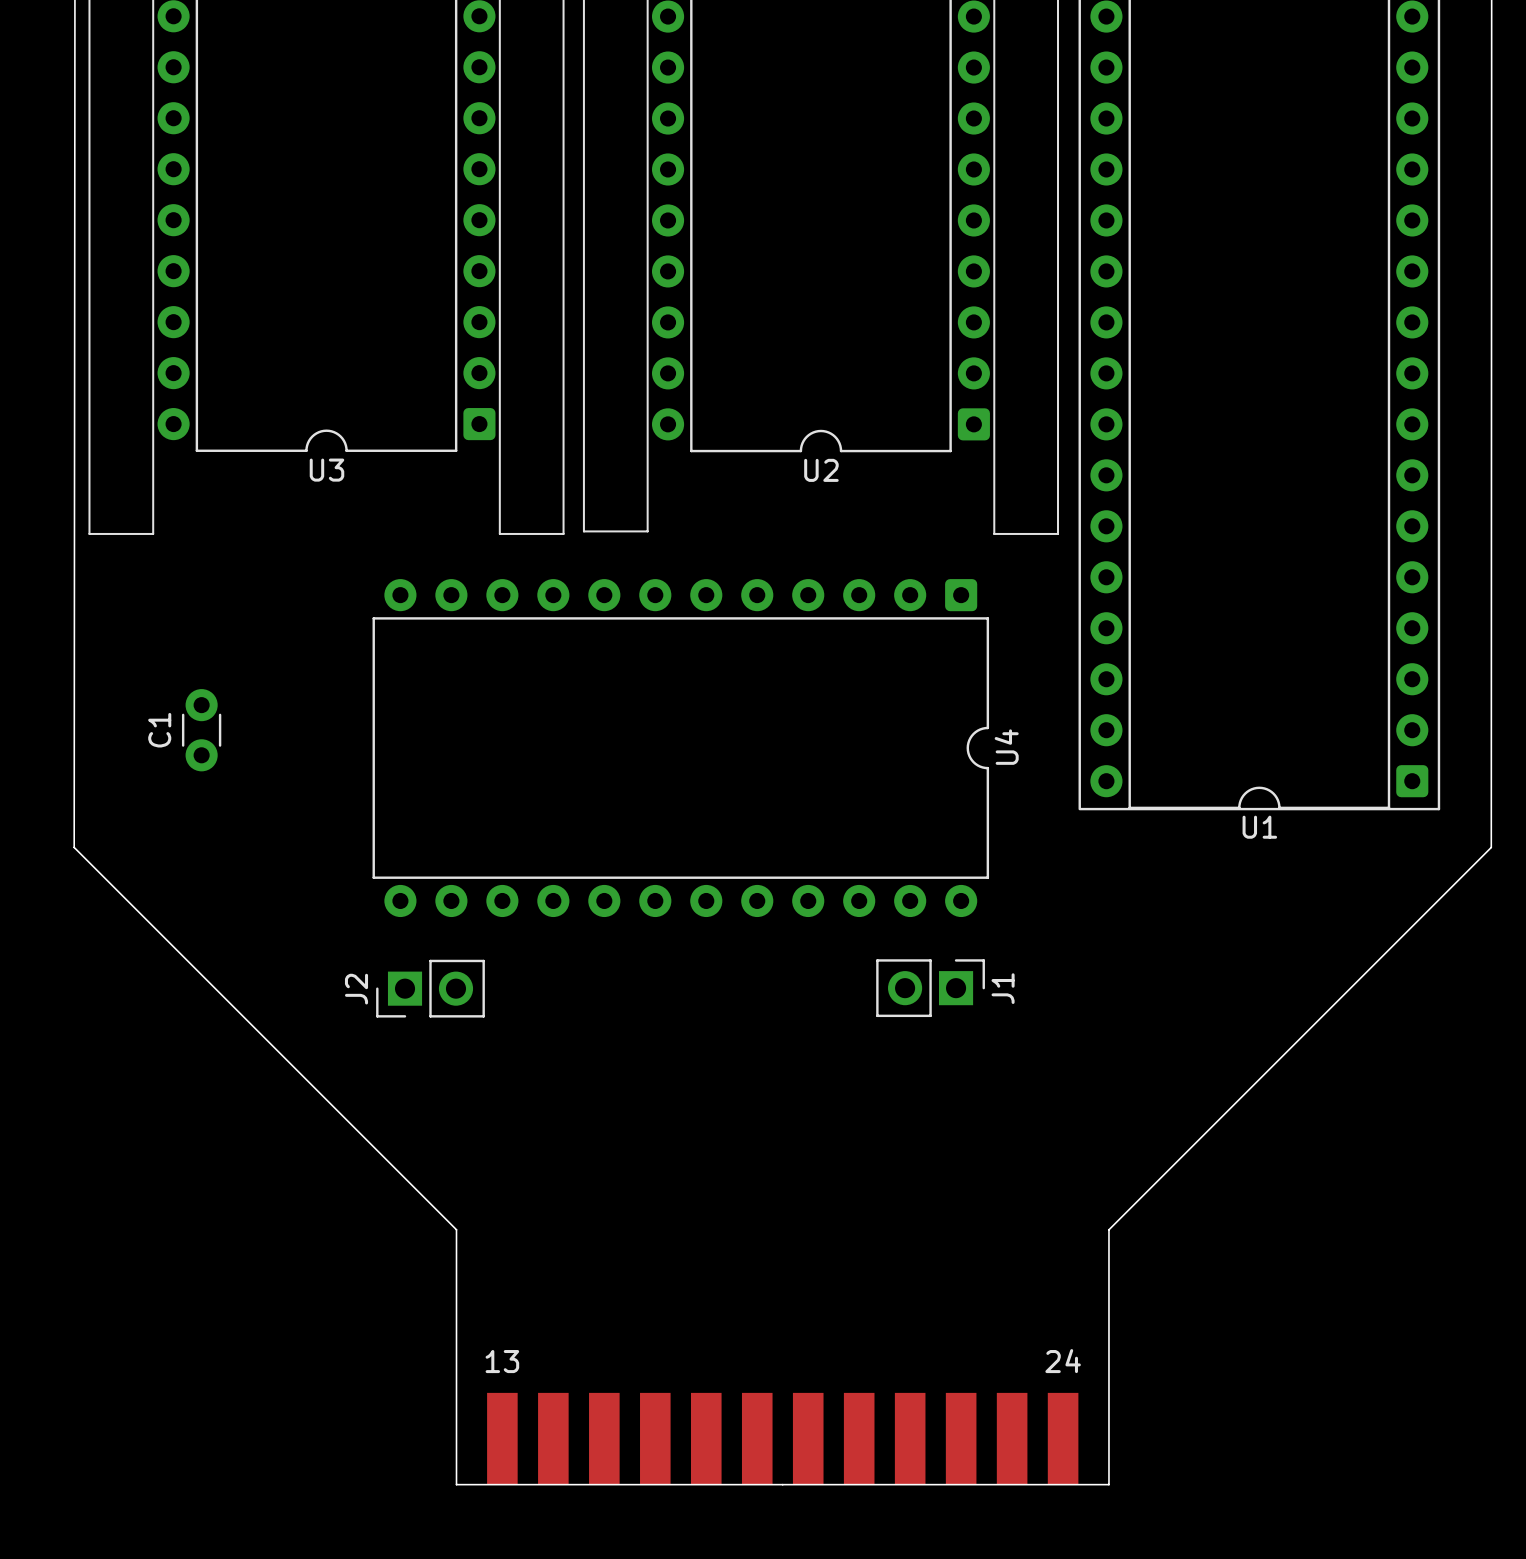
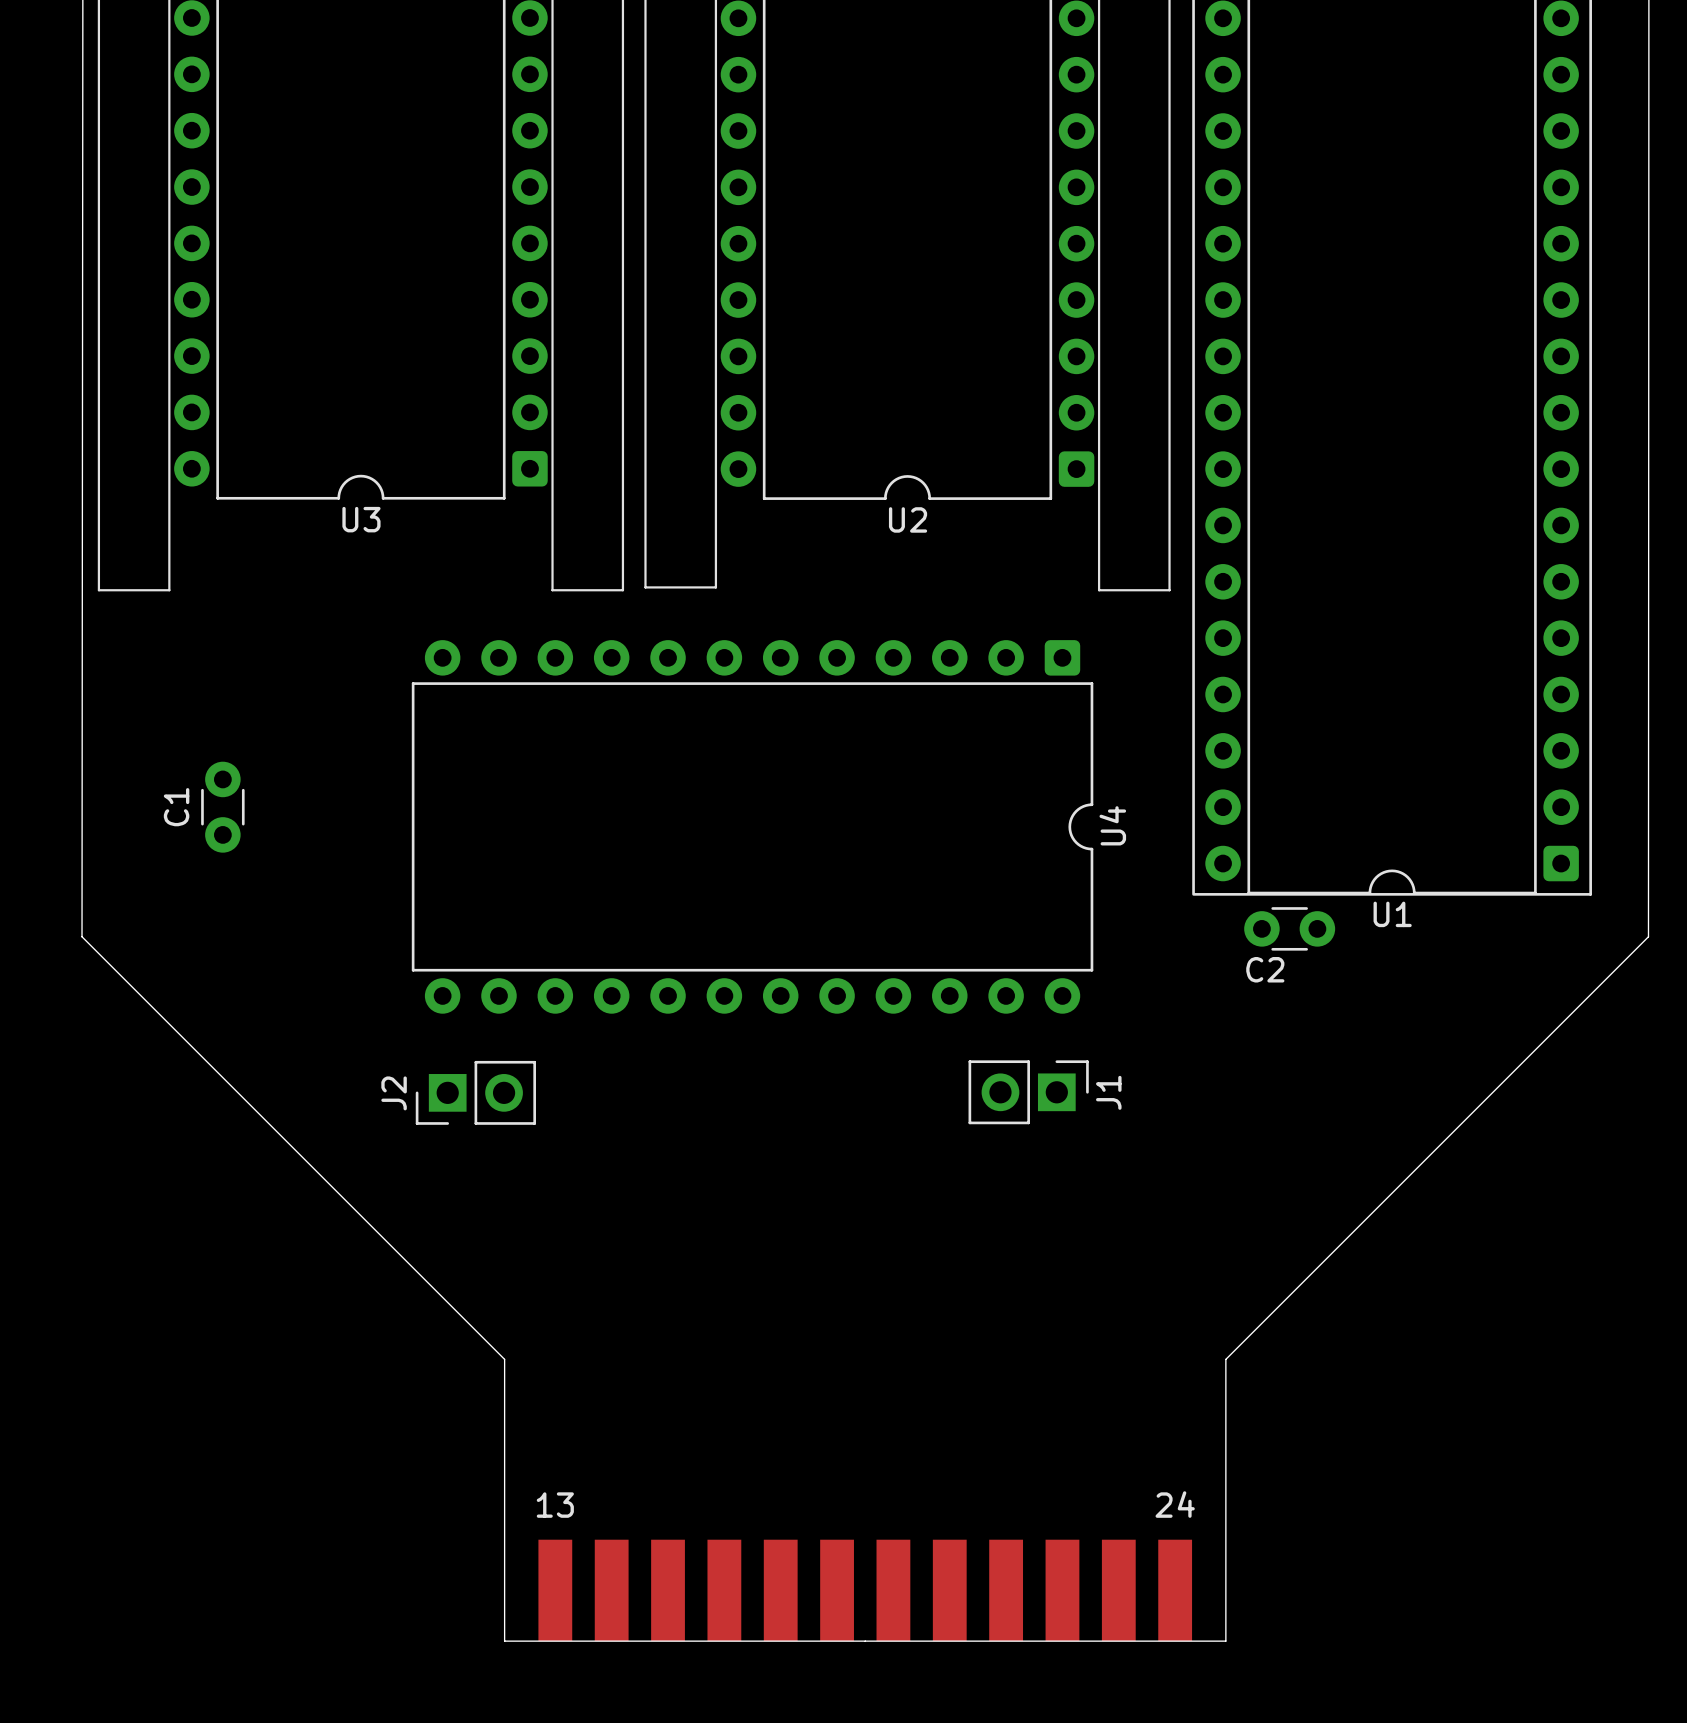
C2: none -> (1289, 928)

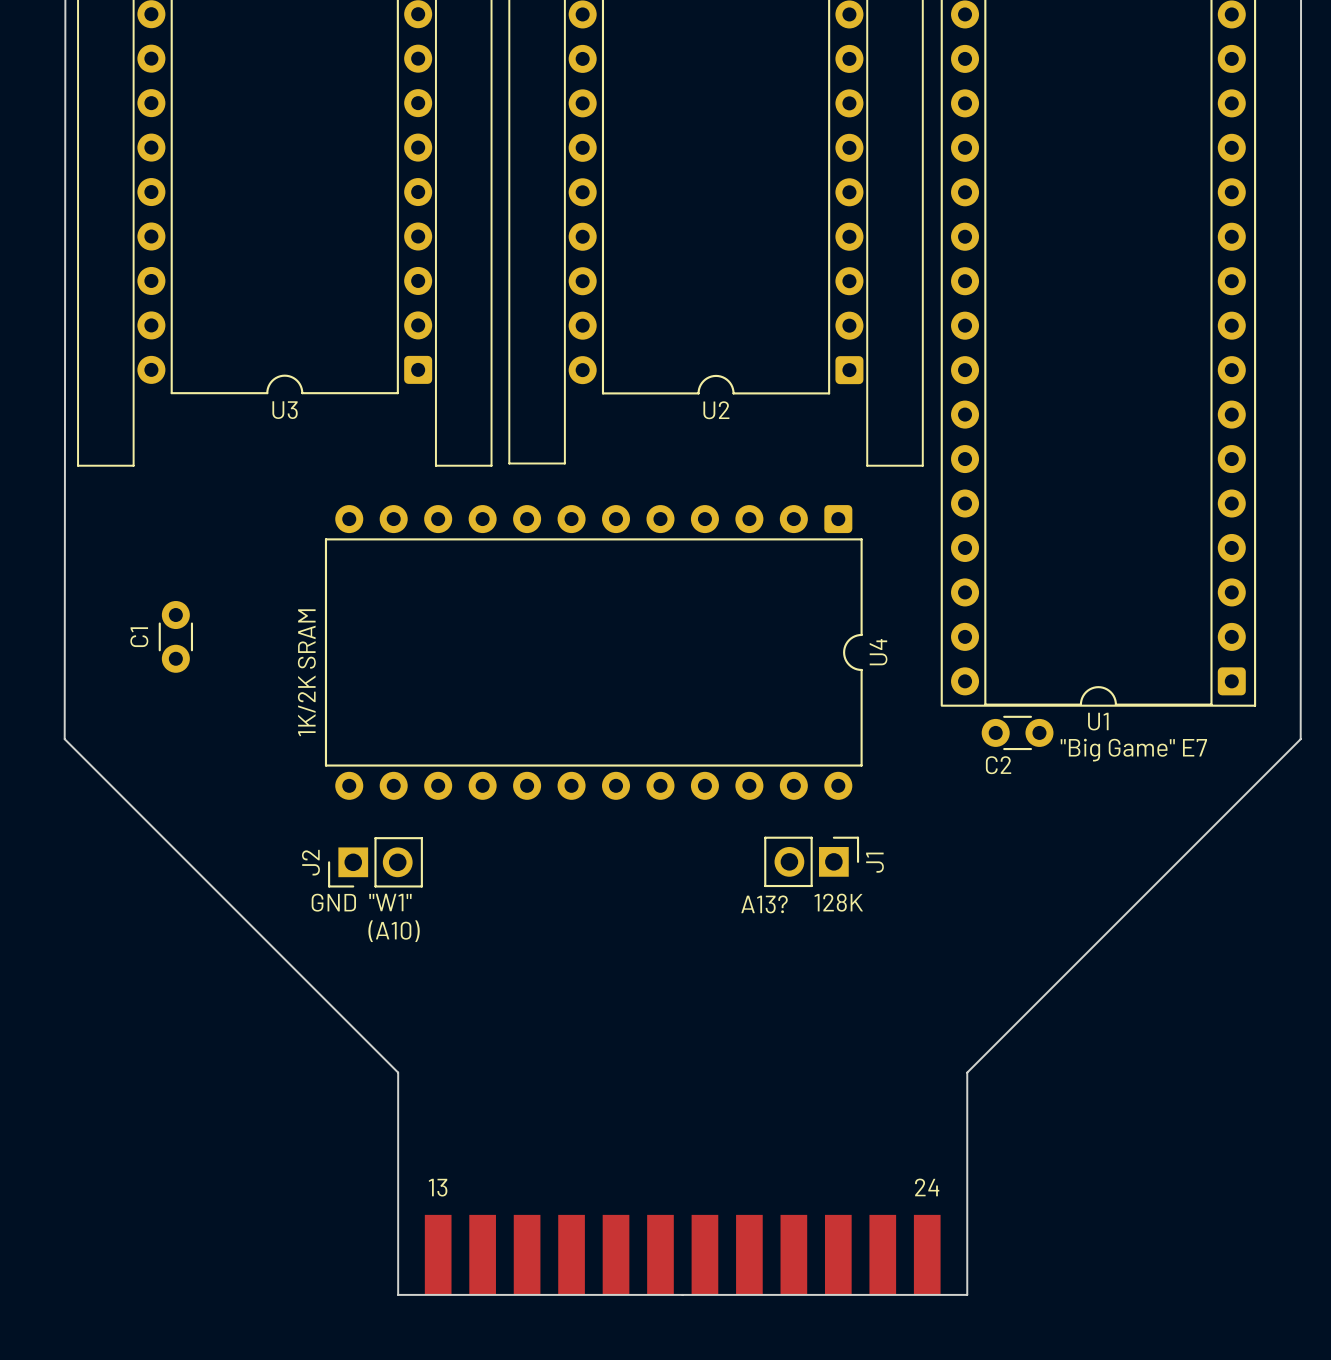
text: none -> 1K/2K SRAM (306, 672)
text: none -> "Big Game" E7 (1133, 750)
text: none -> "W1" (390, 902)
text: none -> GND (333, 902)
text: none -> 128K (838, 902)
text: none -> A13? (764, 904)
text: none -> (A10) (394, 931)

